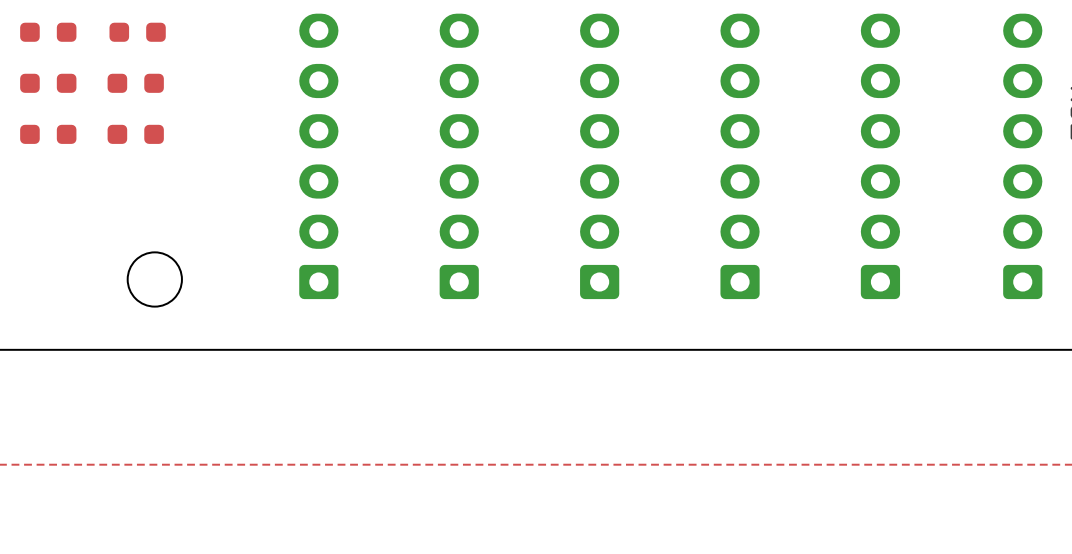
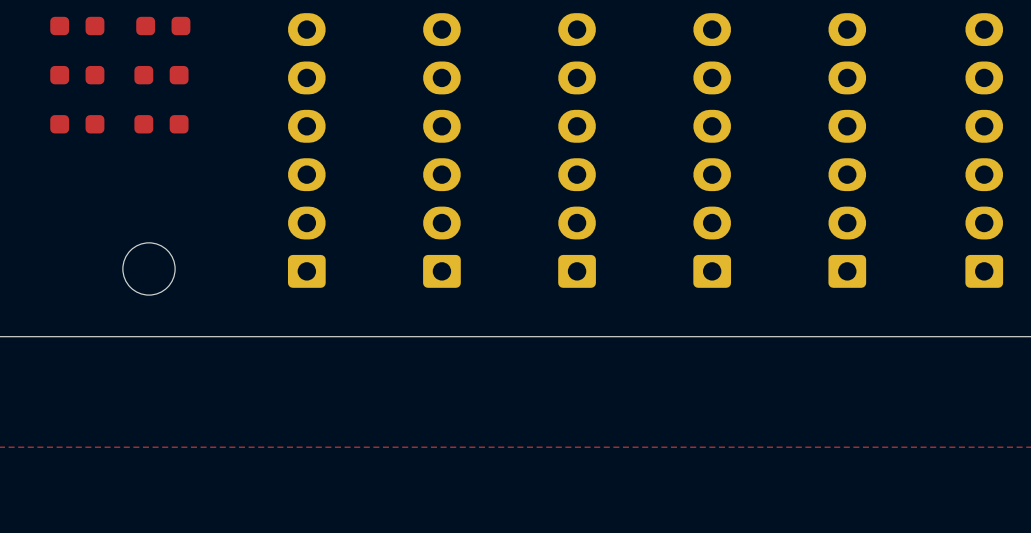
part: none -> (77, 26)
part: none -> (163, 26)
part: (48, 32) -> none
part: (137, 32) -> none
part: none -> (77, 75)
part: none -> (161, 75)
part: (48, 83) -> none
part: (135, 83) -> none
part: none -> (77, 124)
part: none -> (161, 124)
part: (48, 134) -> none
part: (135, 134) -> none

